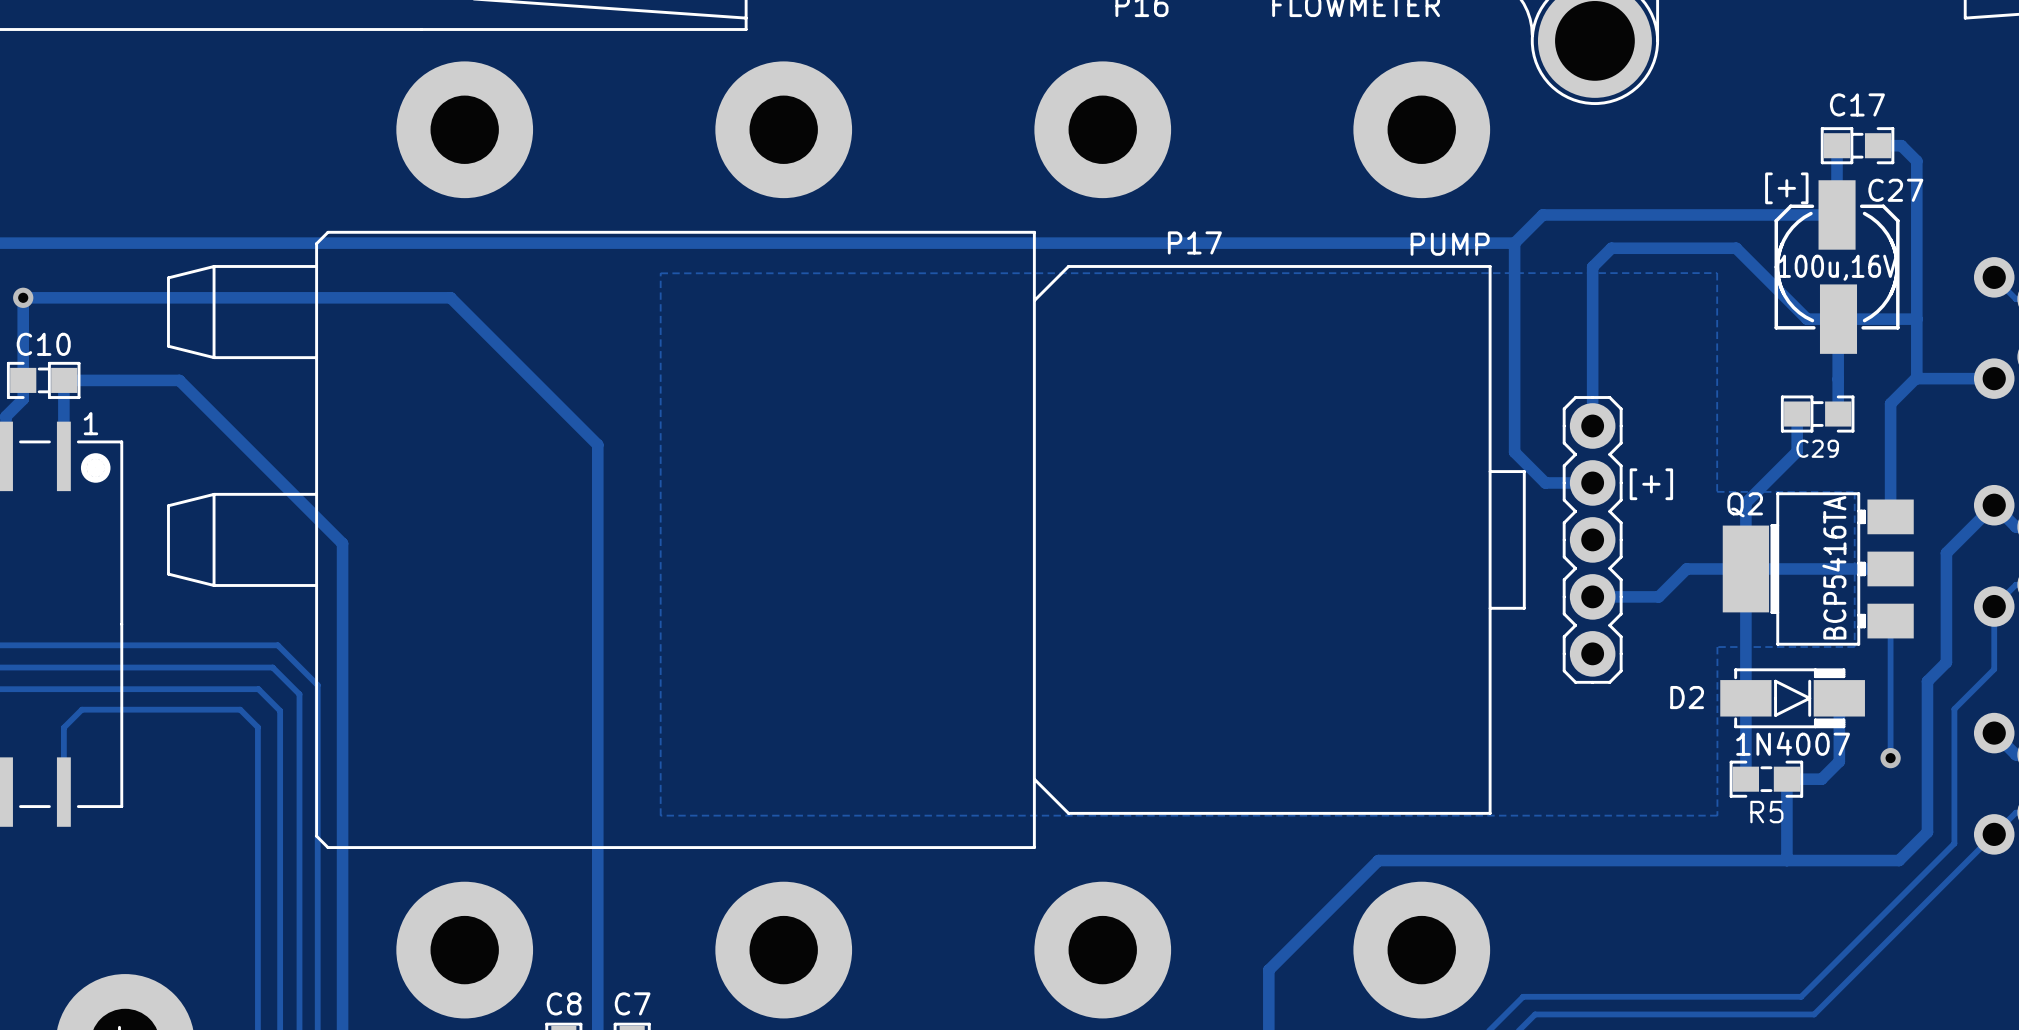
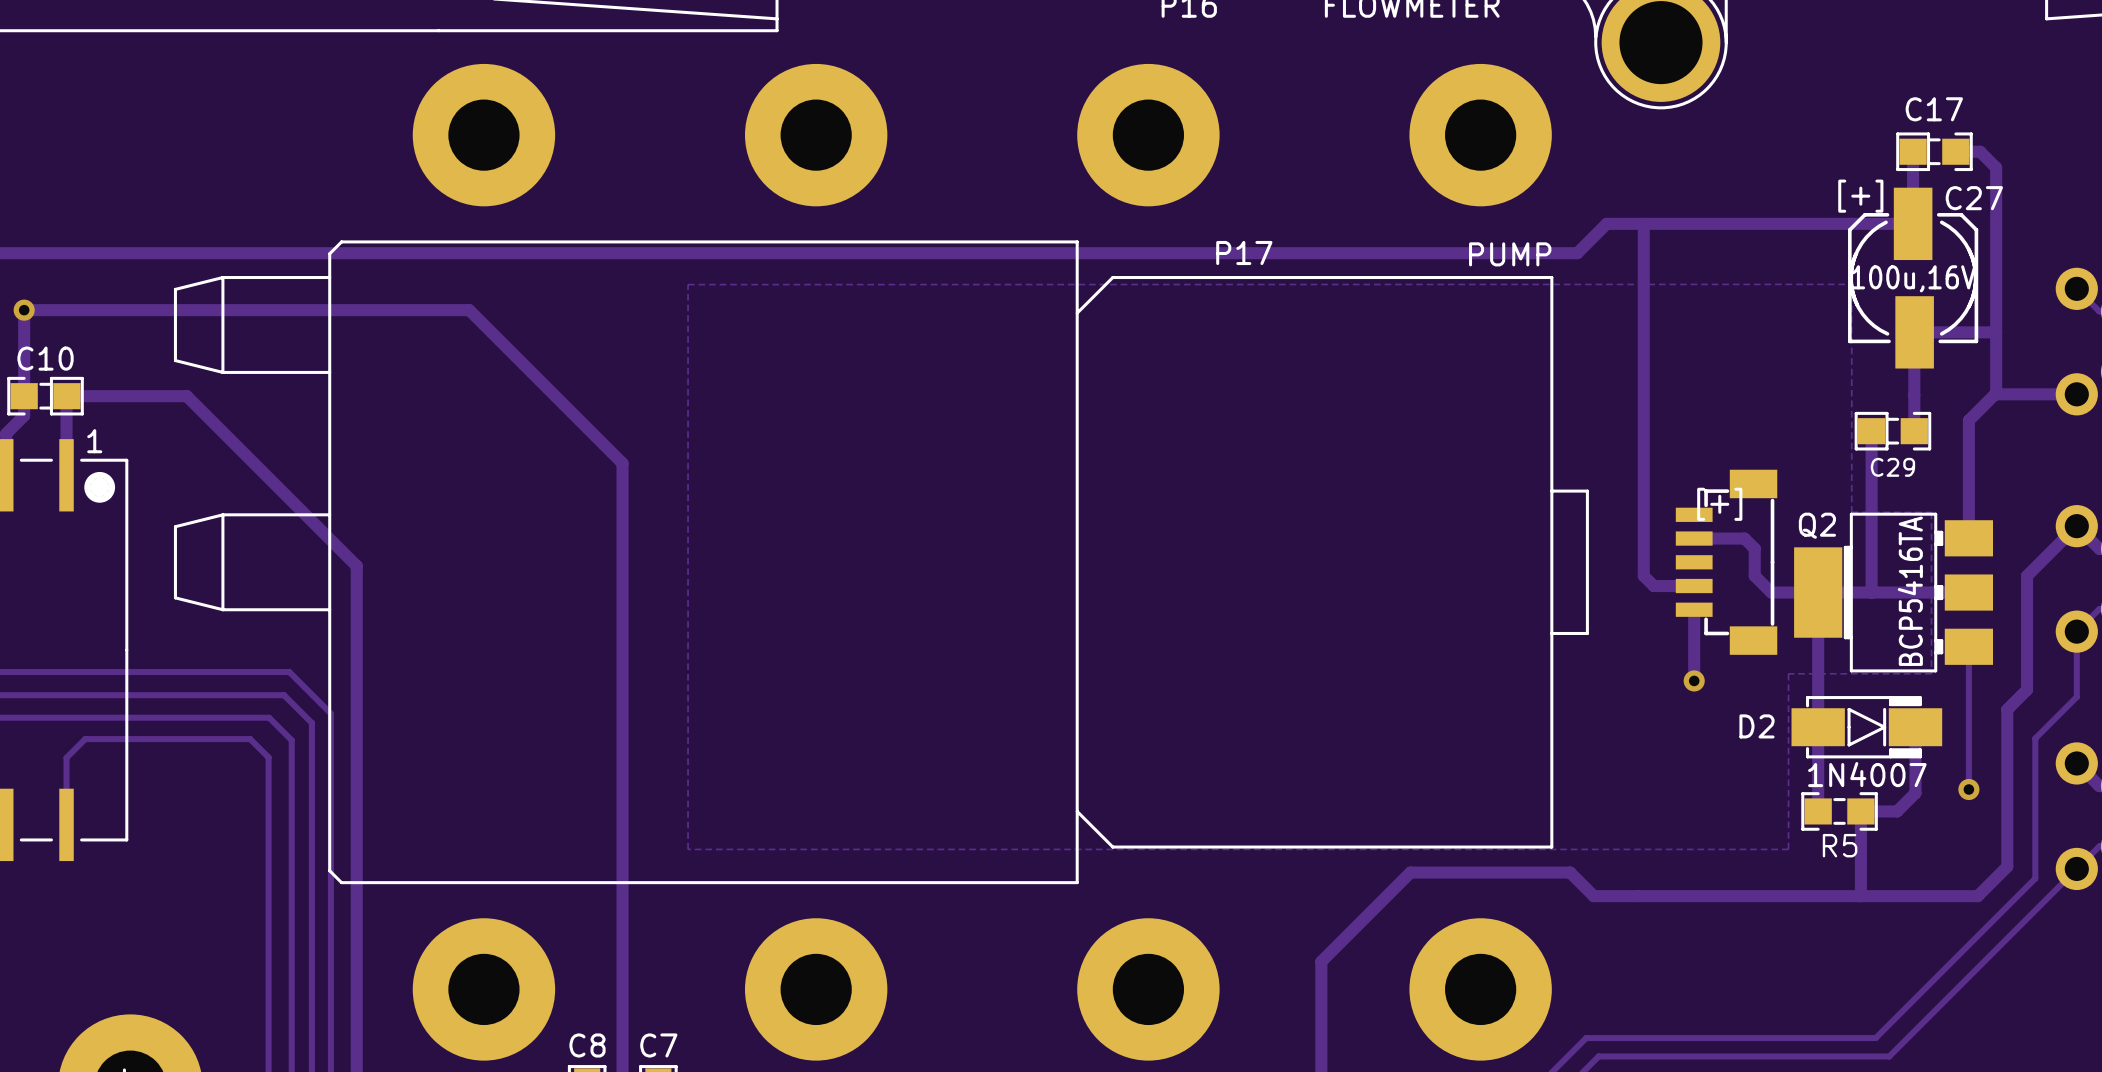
P17 footprint: [167, 61, 1623, 1019] -> [173, 63, 1778, 1061]
track: none -> (1643, 223) (1643, 575) (1653, 586) (1694, 586)
track: (1514, 243) (1514, 452) (1545, 482) (1592, 482) -> none
zone outline: (1717, 273) (1717, 491) (1854, 492) -> (1788, 284) (1851, 284) (1851, 512) (1931, 512)
track: (1838, 319) (1807, 319) (1736, 248) (1611, 248) (1592, 267) (1592, 425) -> none
track: (1797, 451) (1745, 502) (1745, 568) -> (1871, 470) (1871, 592)
track: (1700, 568) (1686, 568) (1658, 596) (1592, 596) -> (1771, 592) (1754, 575) (1754, 548) (1744, 538) (1694, 538)
track: none -> (1694, 609) (1694, 680)
via: none -> (1694, 680)
track: (1530, 860) (1378, 860) (1268, 970) -> (1593, 896) (1570, 872) (1410, 872) (1321, 961) (1321, 1010)

